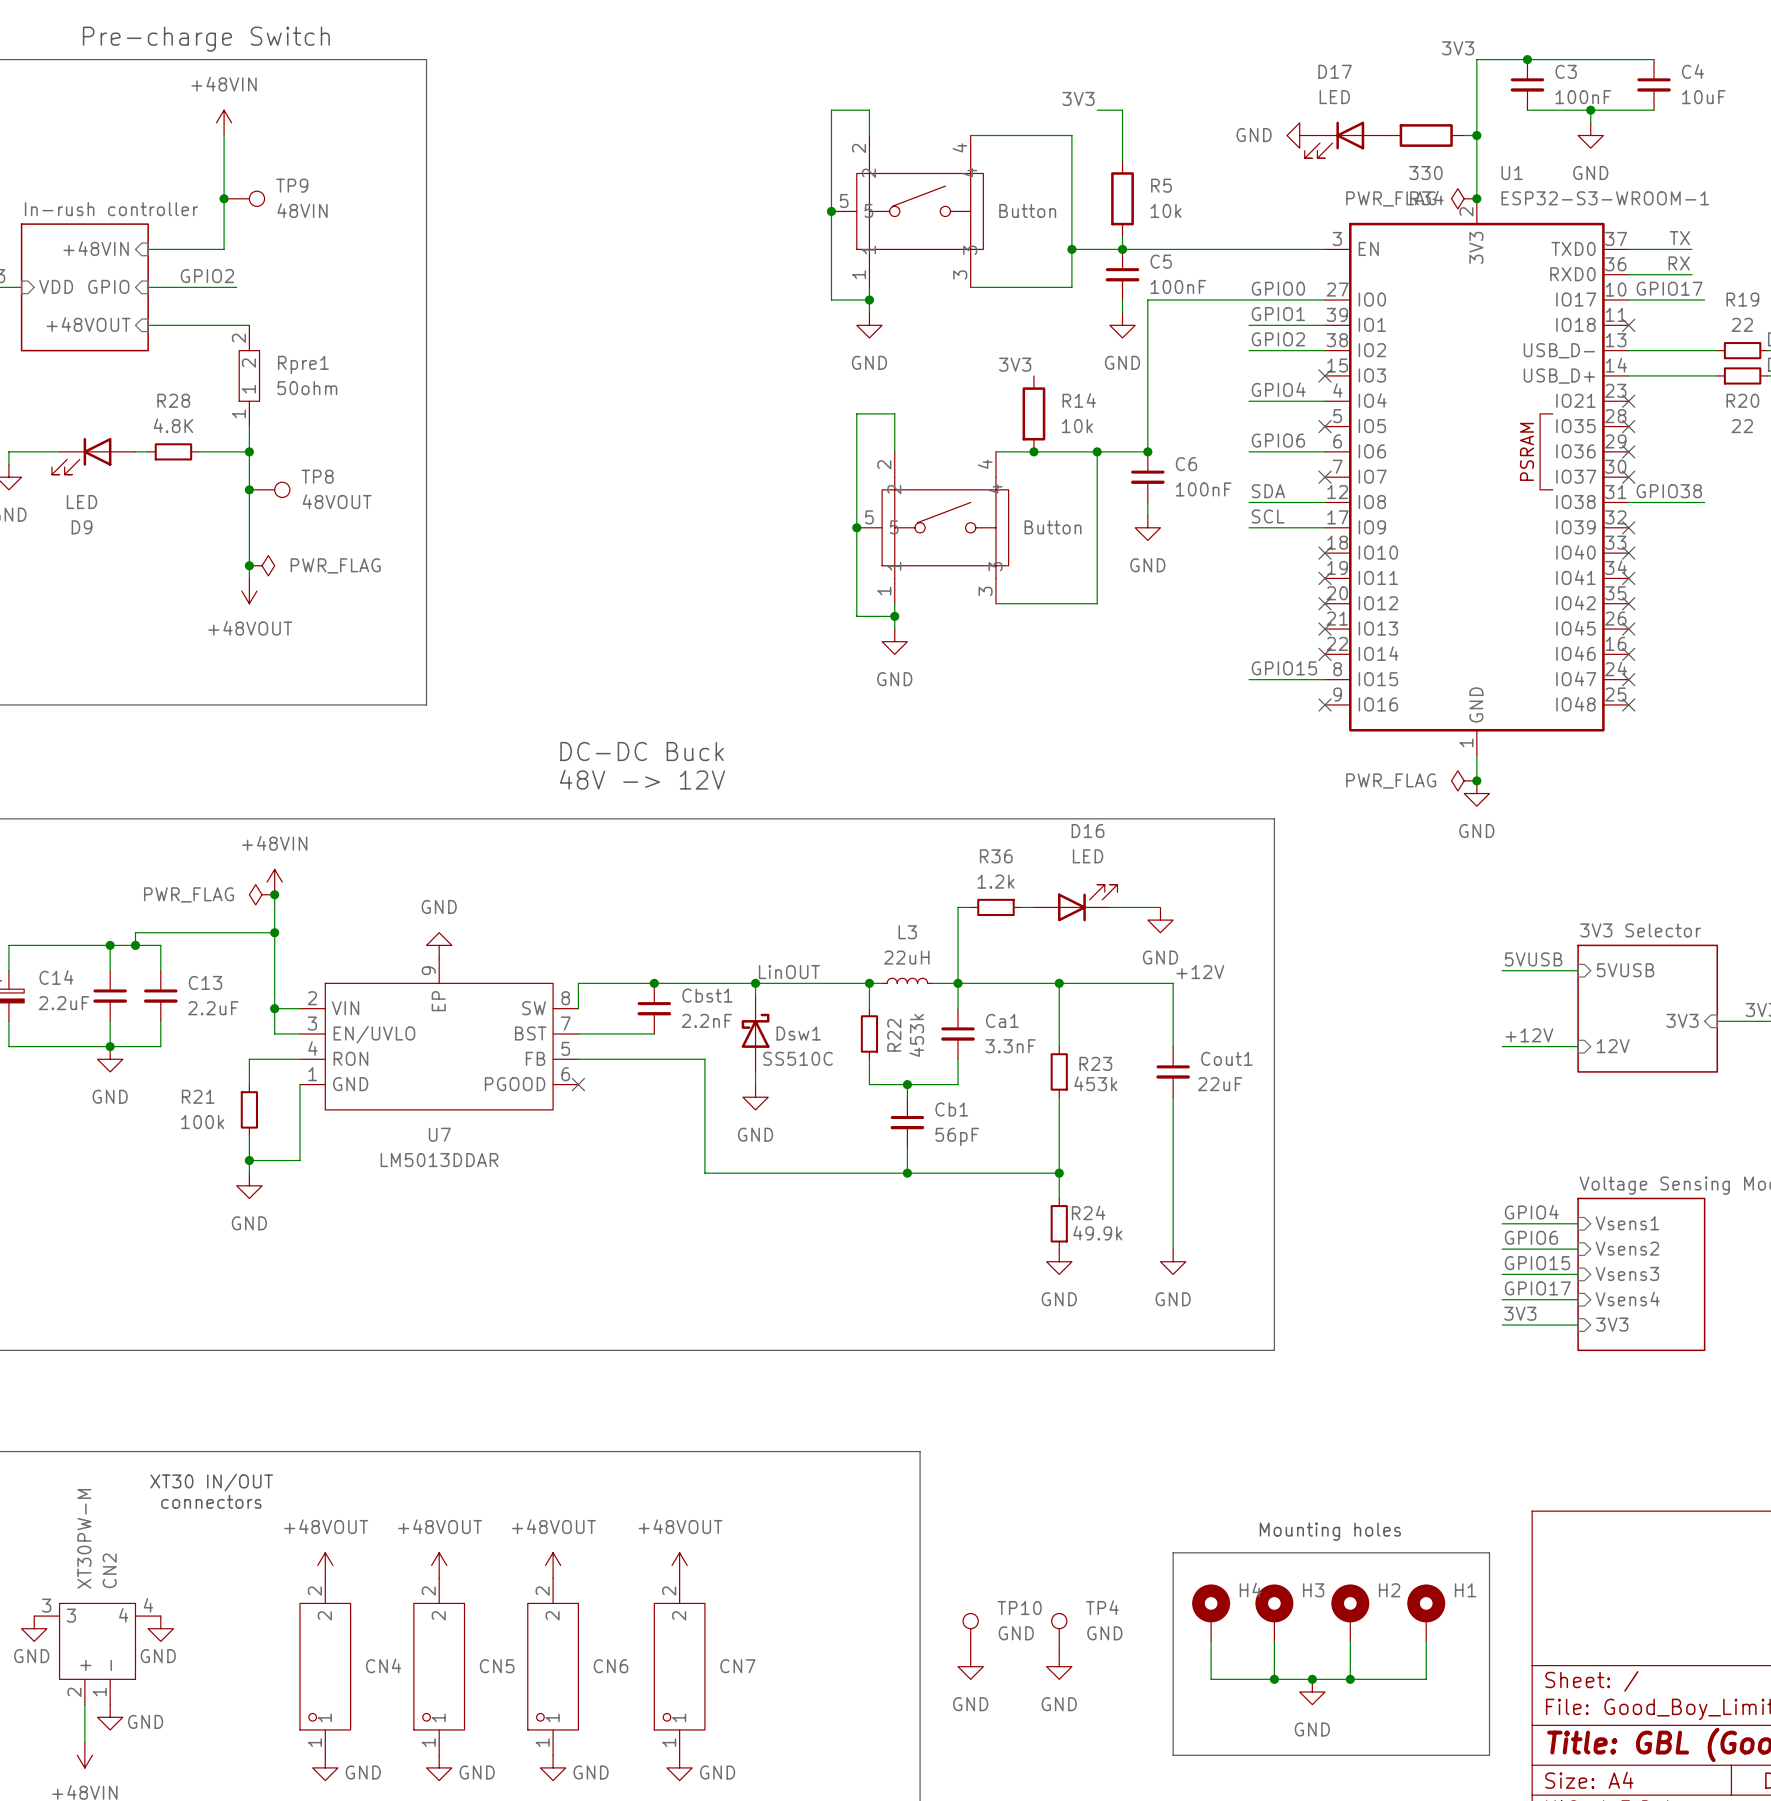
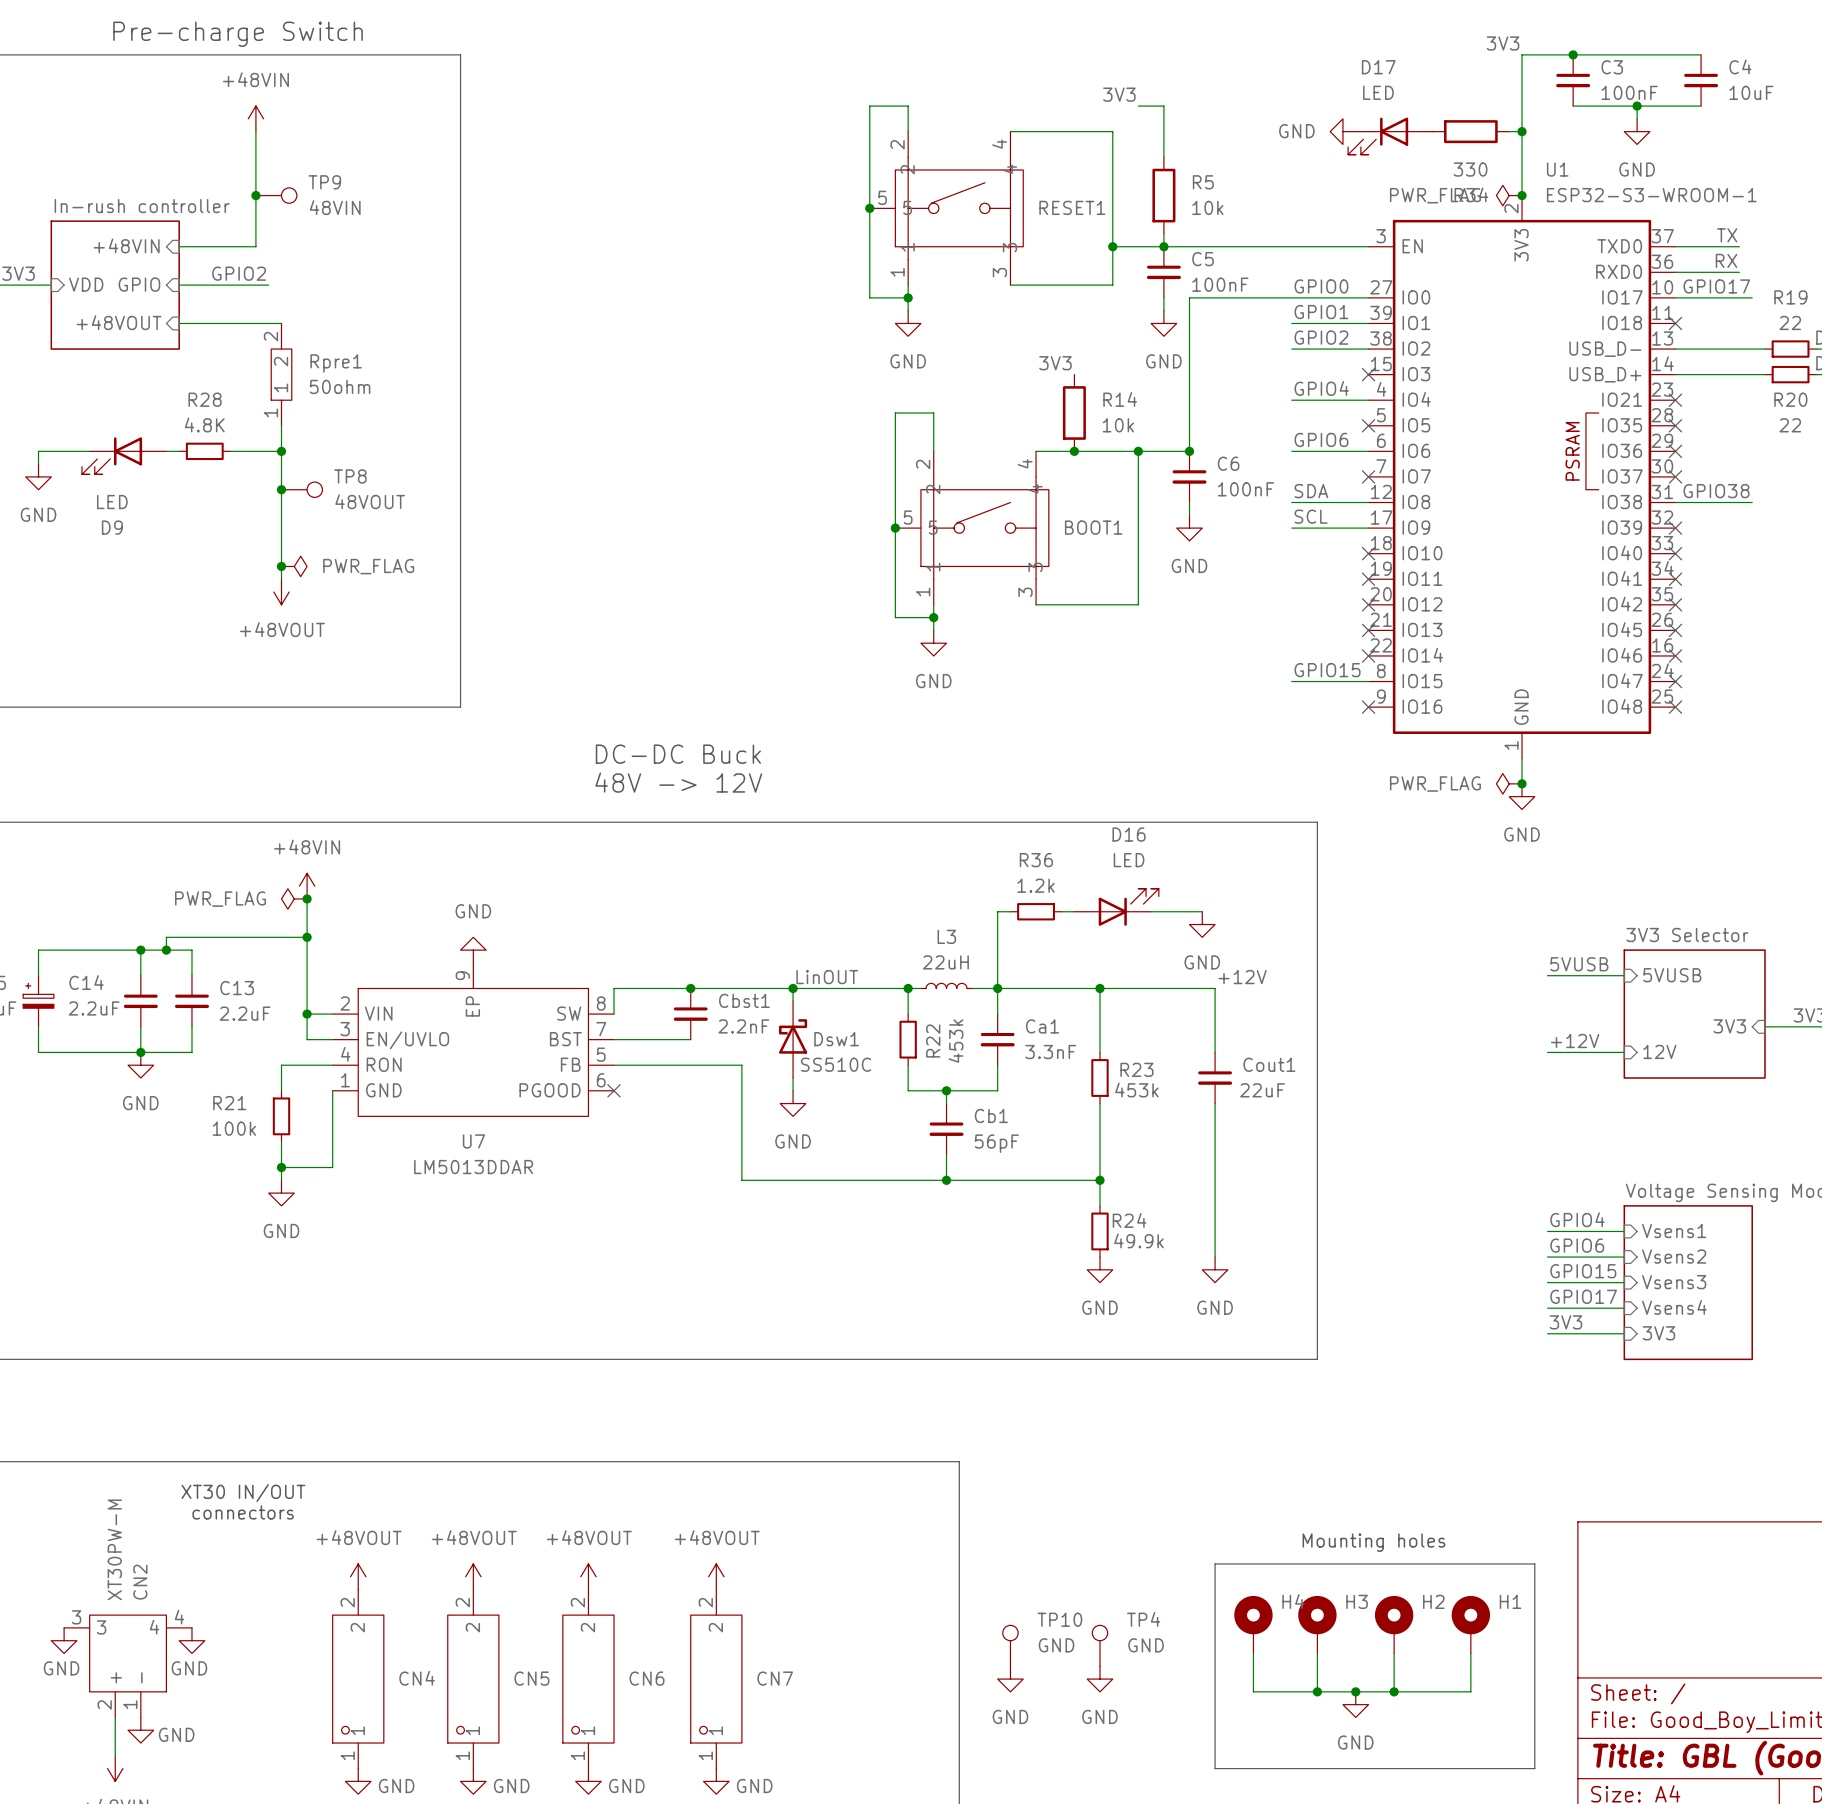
part value: Button (1027, 210) -> RESET1 (1072, 207)
part value: Button (1053, 527) -> BOOT1 (1093, 527)

